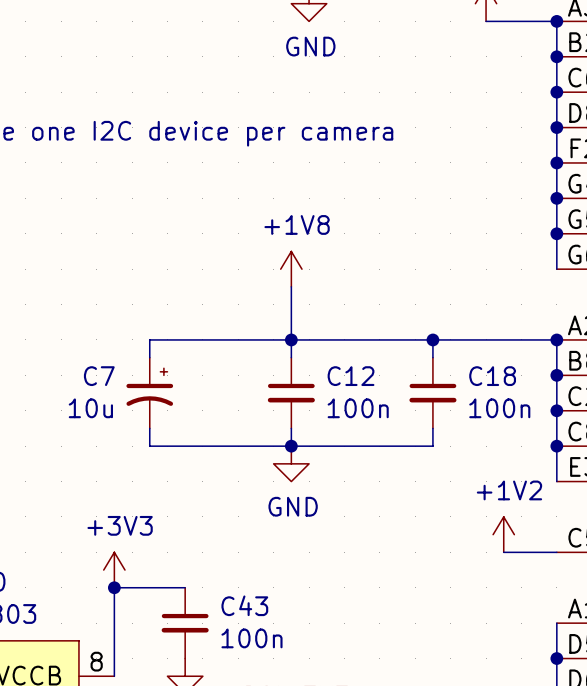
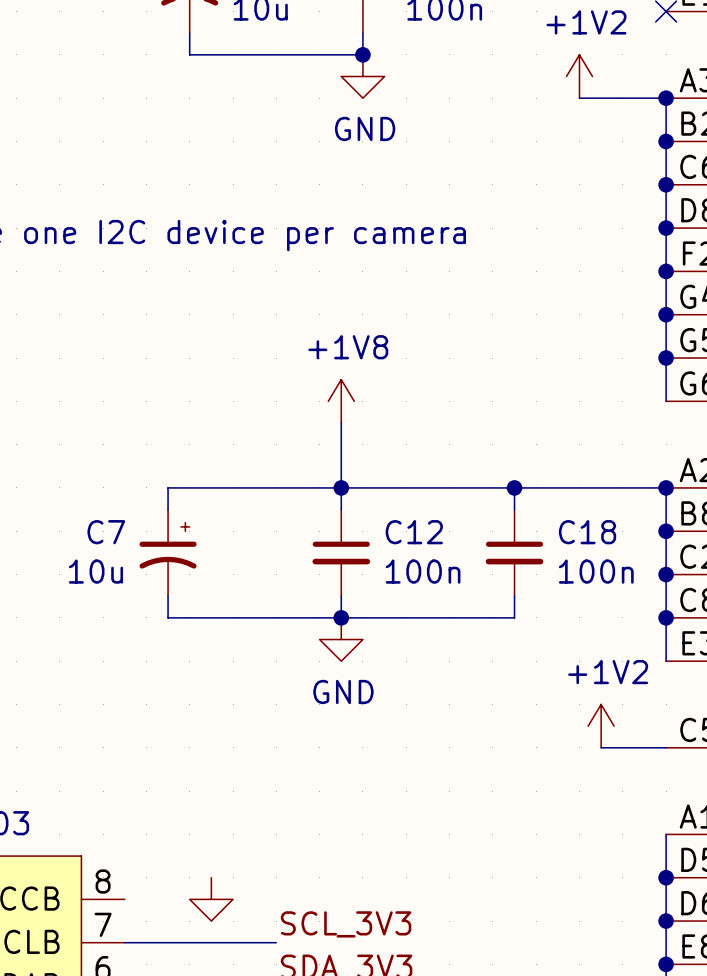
power symbol: +3V3 (114, 570) -> none
junction: (114, 587) -> none
wire: (185, 587) (114, 587) (114, 676) -> none
C43: 100n (185, 623) -> none

